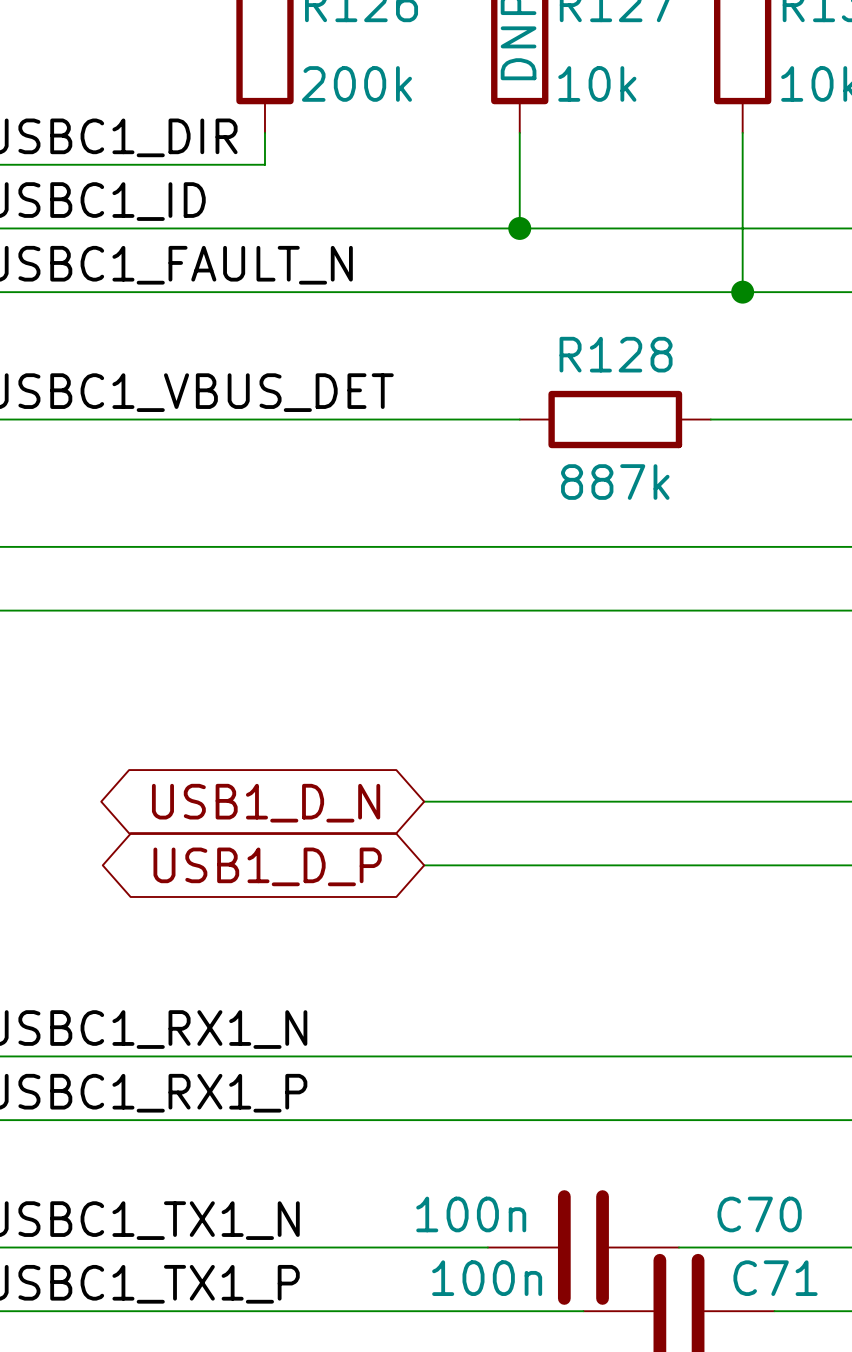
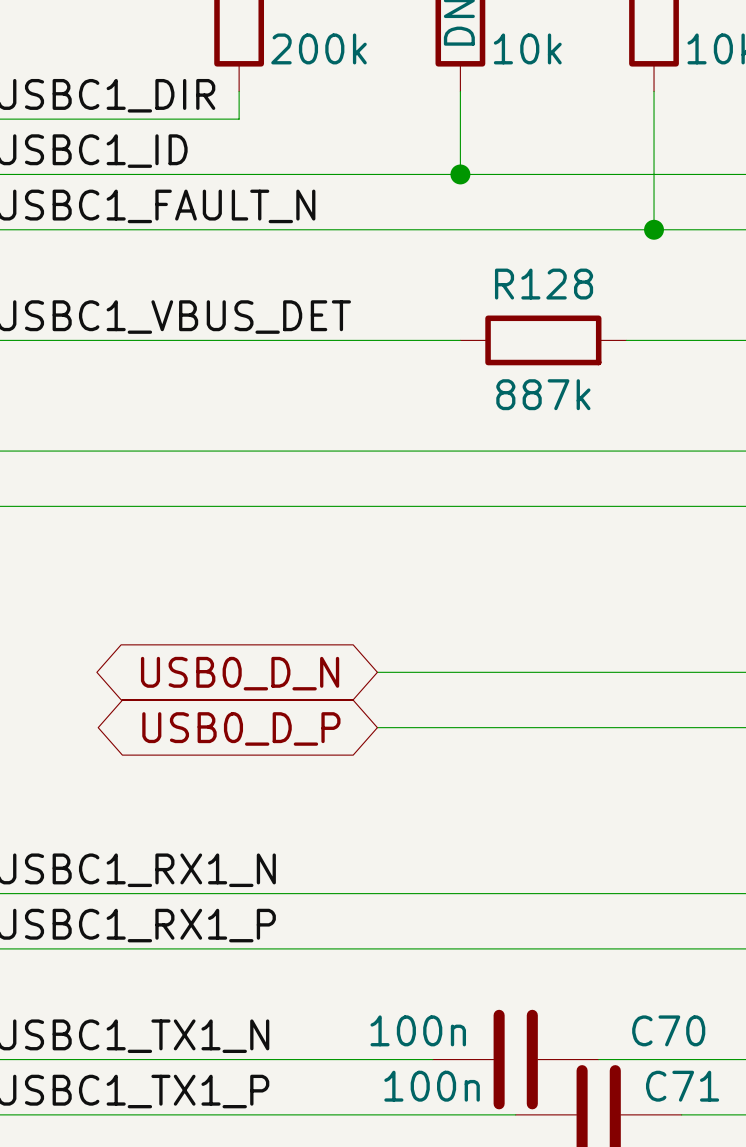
global label: USB1_D_N (266, 803) -> USB0_D_N (240, 673)
global label: USB1_D_P (267, 866) -> USB0_D_P (241, 728)

